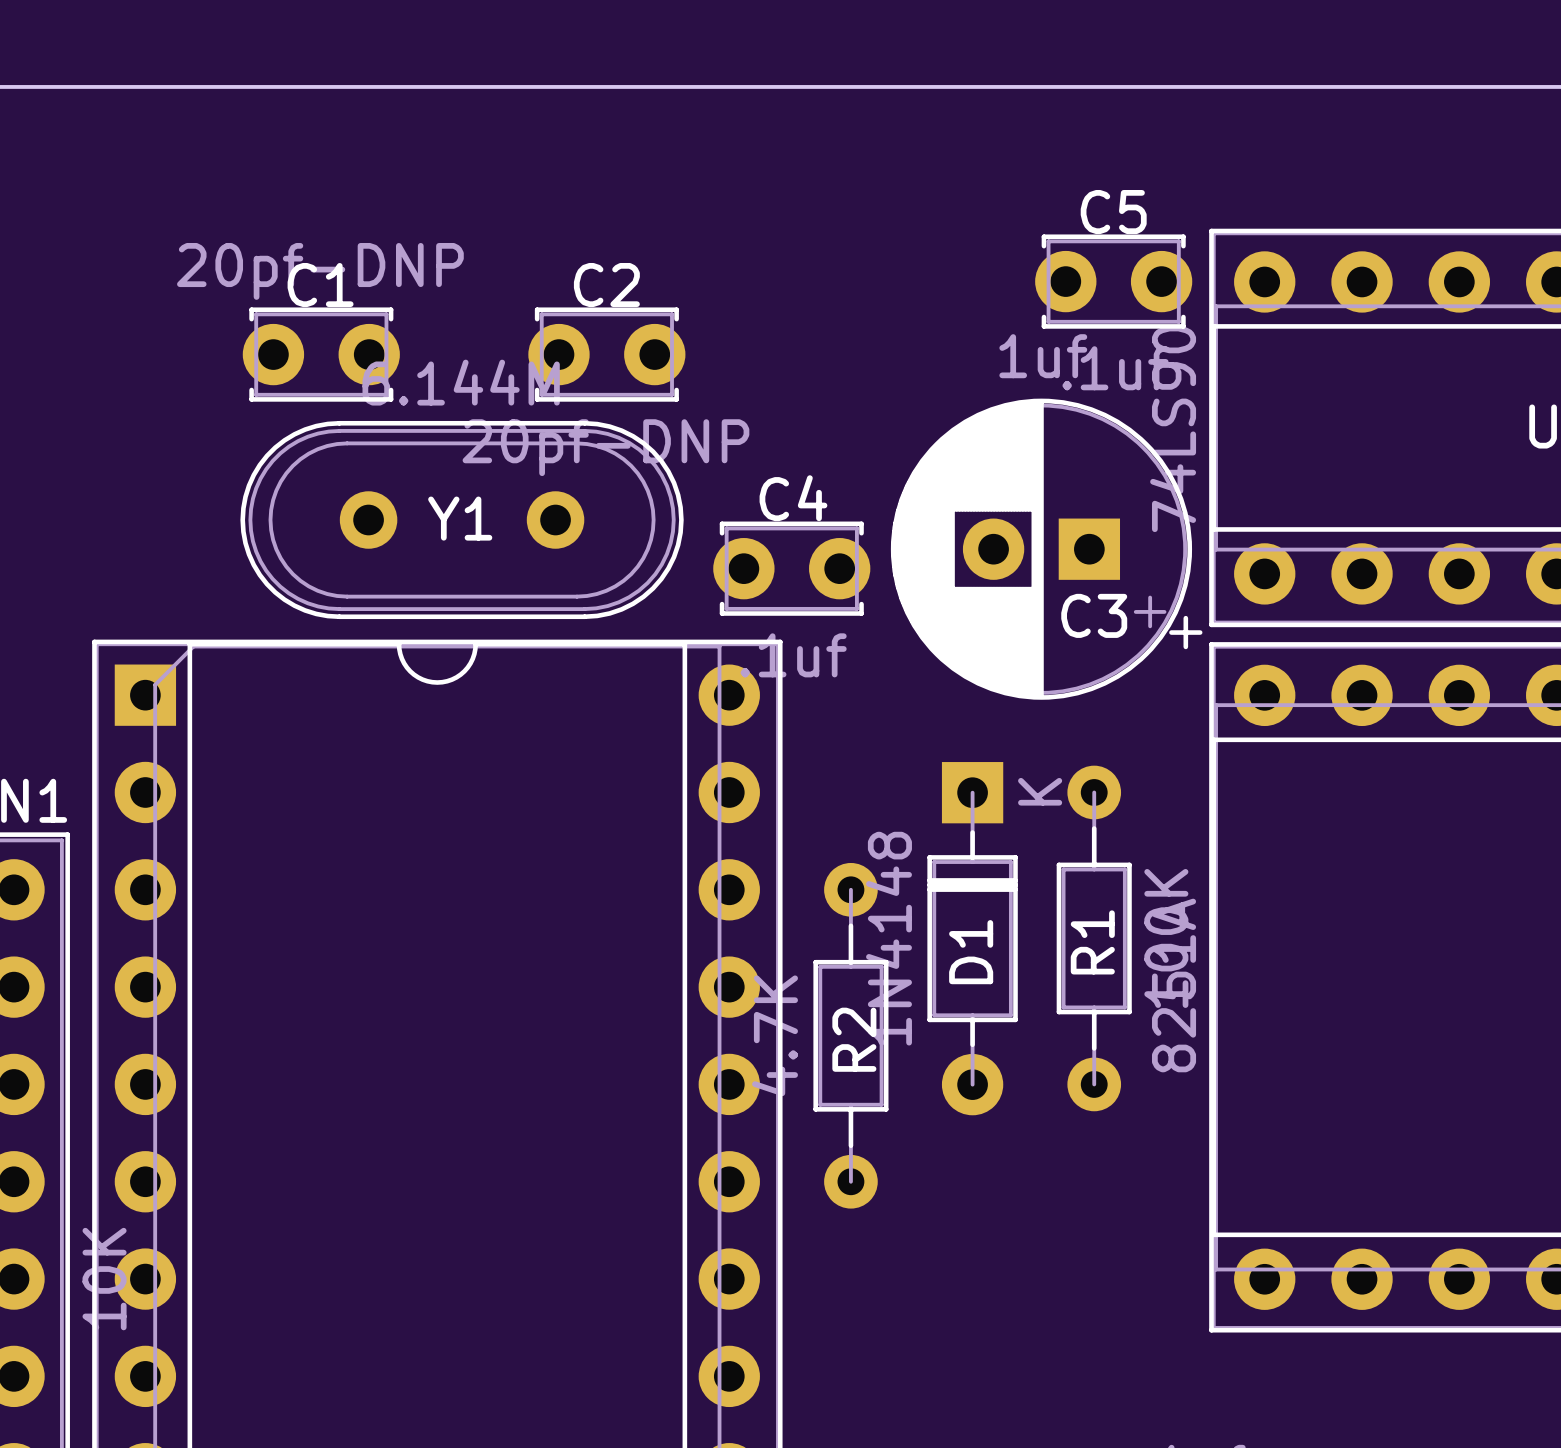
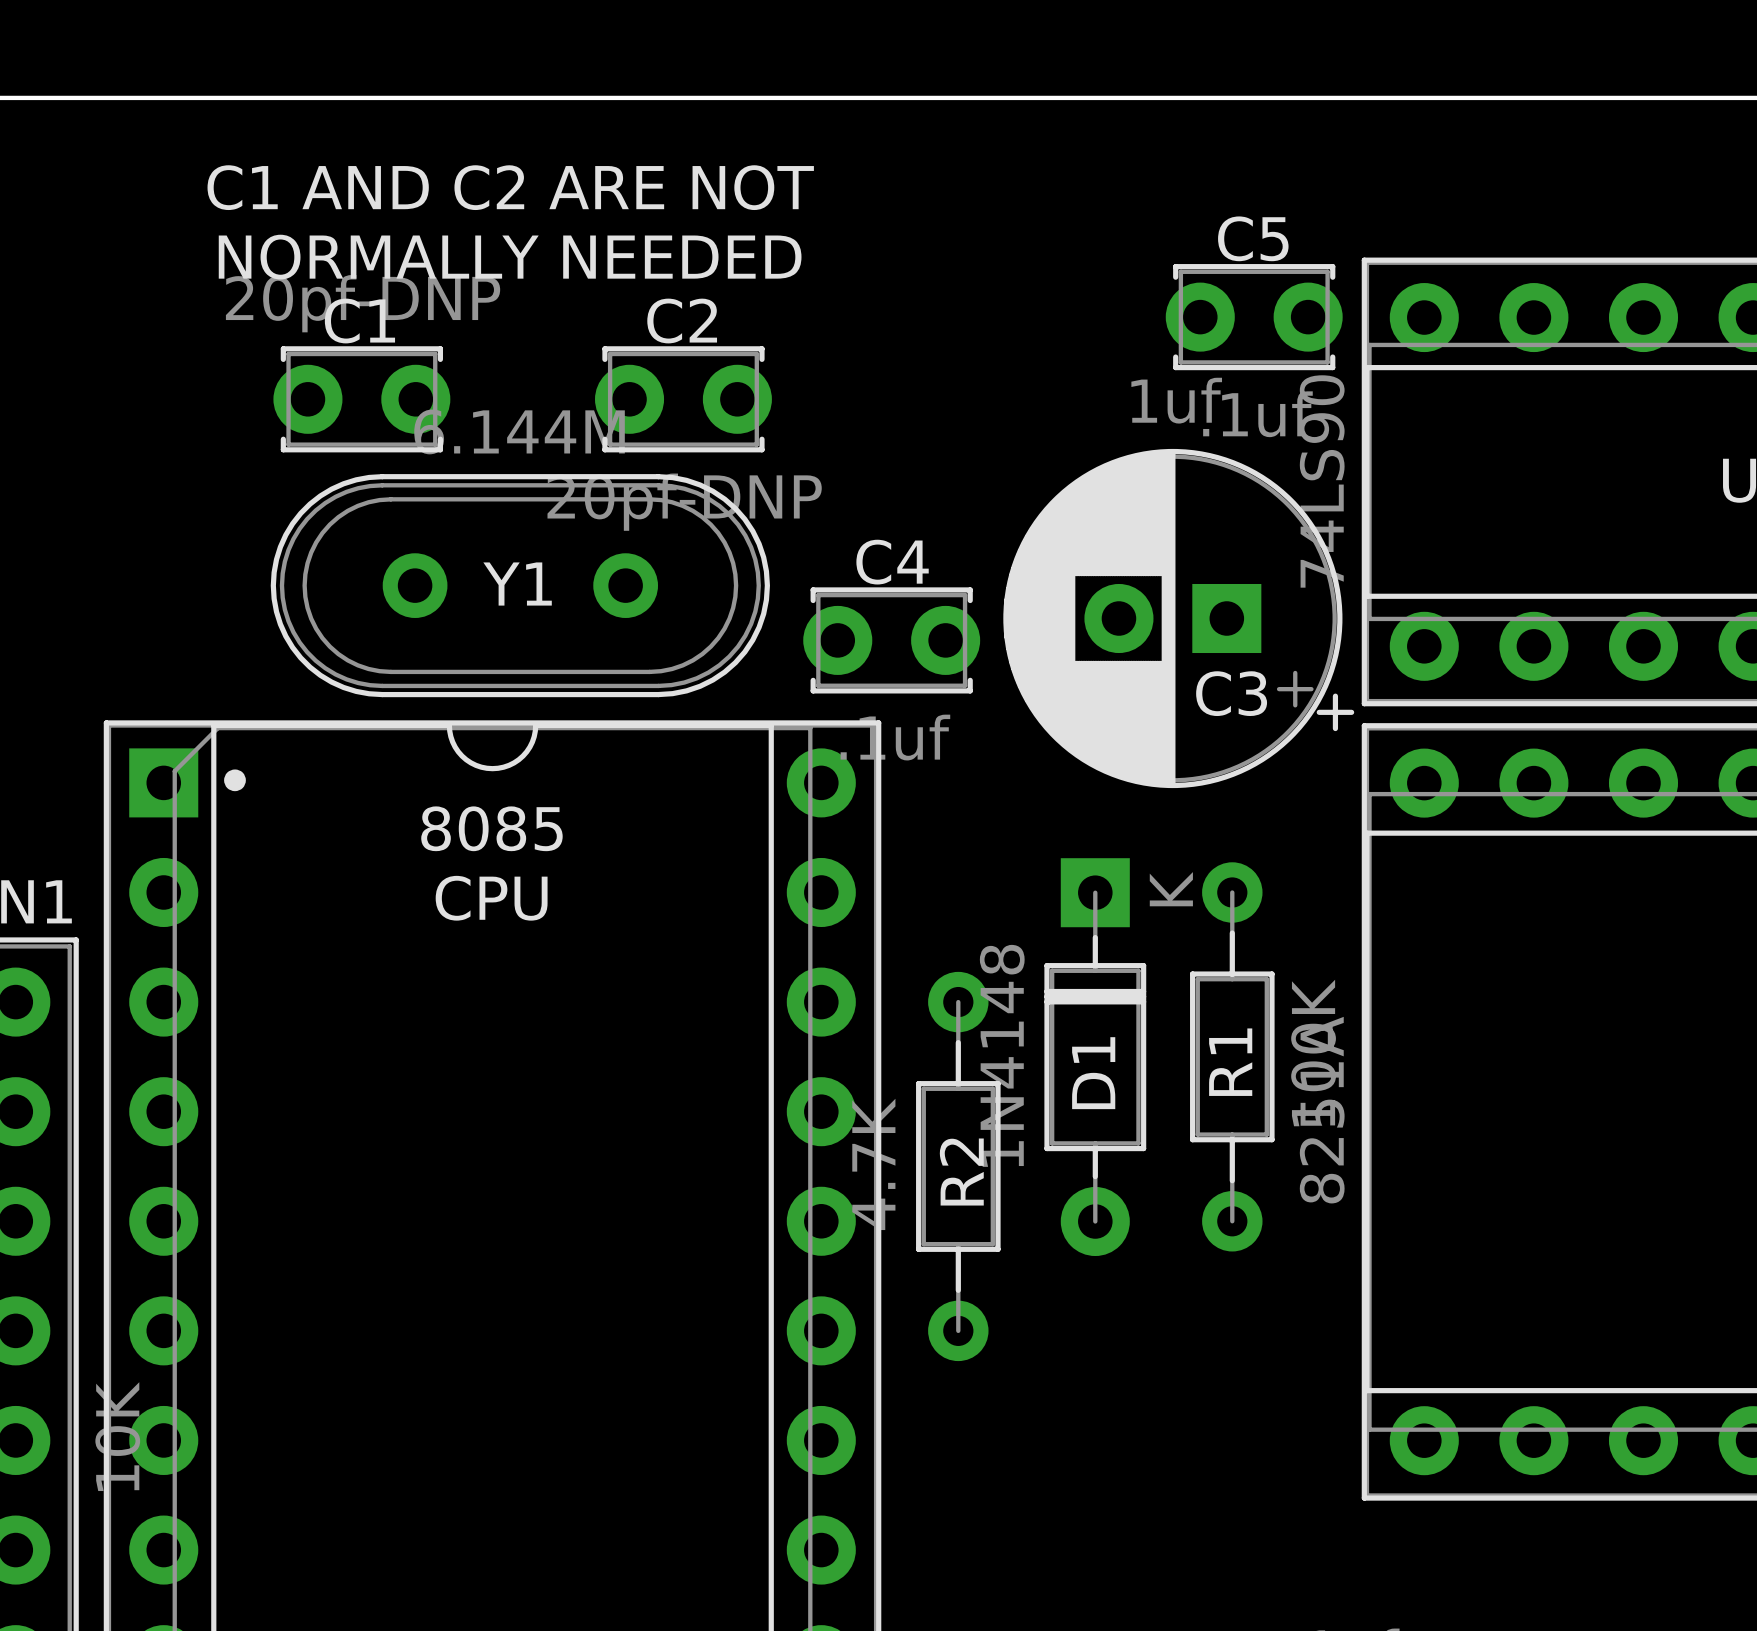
text: none -> C1 AND C2 ARE NOT (510, 187)
text: none -> NORMALLY NEEDED (510, 257)
text: none -> • (234, 780)
text: none -> 8085 (491, 828)
text: none -> CPU (491, 898)

